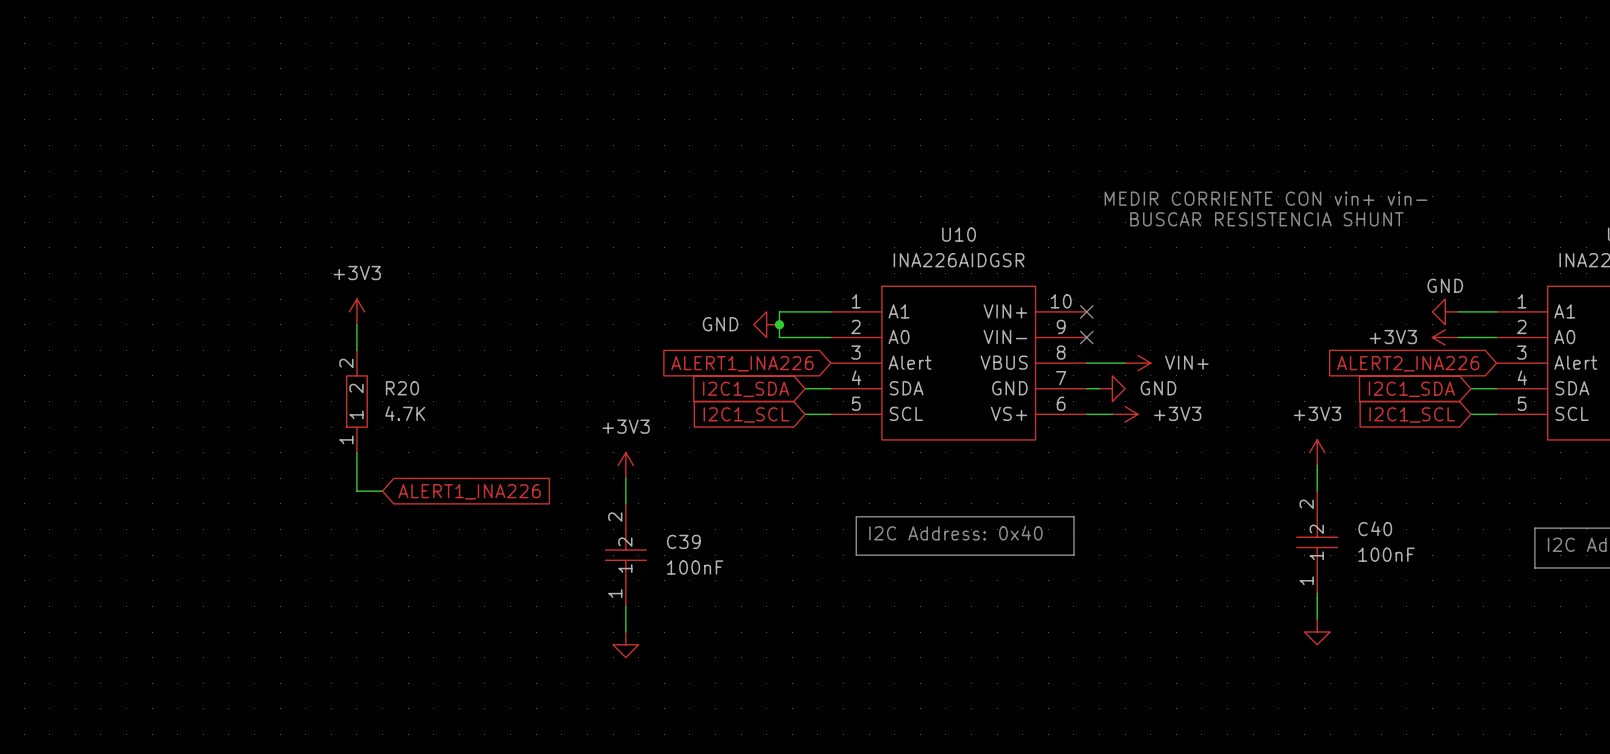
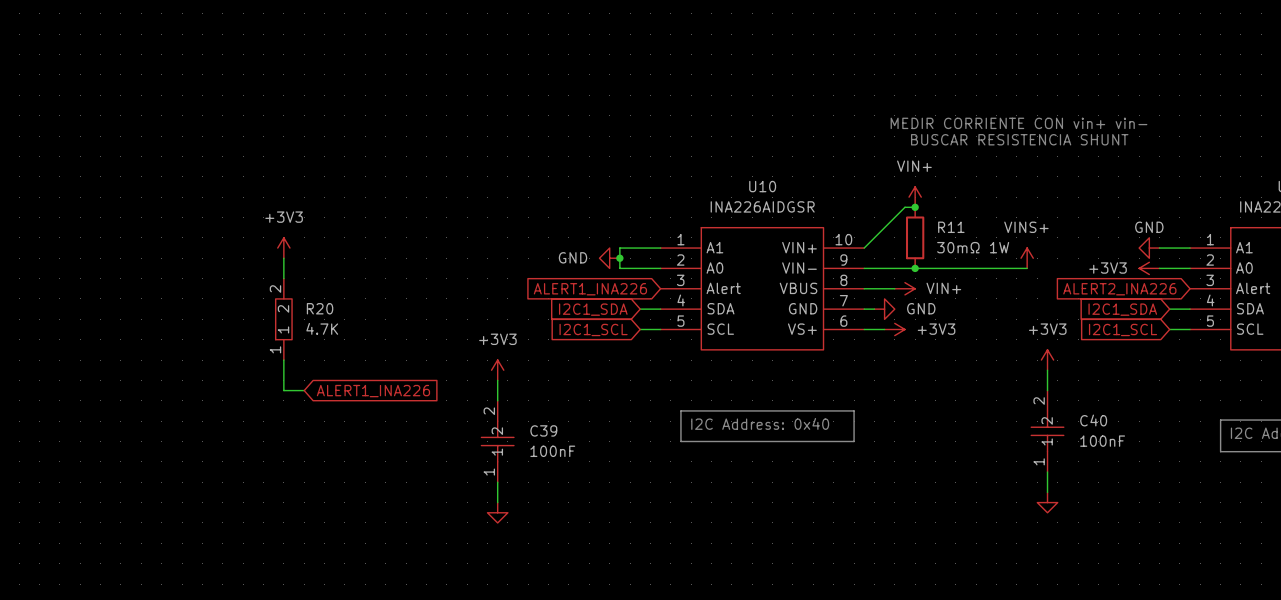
text position: MEDIR CORRIENTE CON vin+ vin- (1266, 198) -> MEDIR CORRIENTE CON vin+ vin- (1019, 123)
text position: BUSCAR RESISTENCIA SHUNT (1266, 219) -> BUSCAR RESISTENCIA SHUNT (1019, 139)
power symbol: none -> VIN+ (915, 197)
wire: none -> (915, 207) (904, 207) (864, 248)
junction: none -> (915, 207)
R11: none -> 30mΩ 1W (915, 237)
no-connect mark: (1086, 311) -> none
power symbol: none -> VINS+ (1027, 258)
wire: none -> (864, 268) (1027, 268)
no-connect mark: (1086, 337) -> none
junction: none -> (915, 268)

